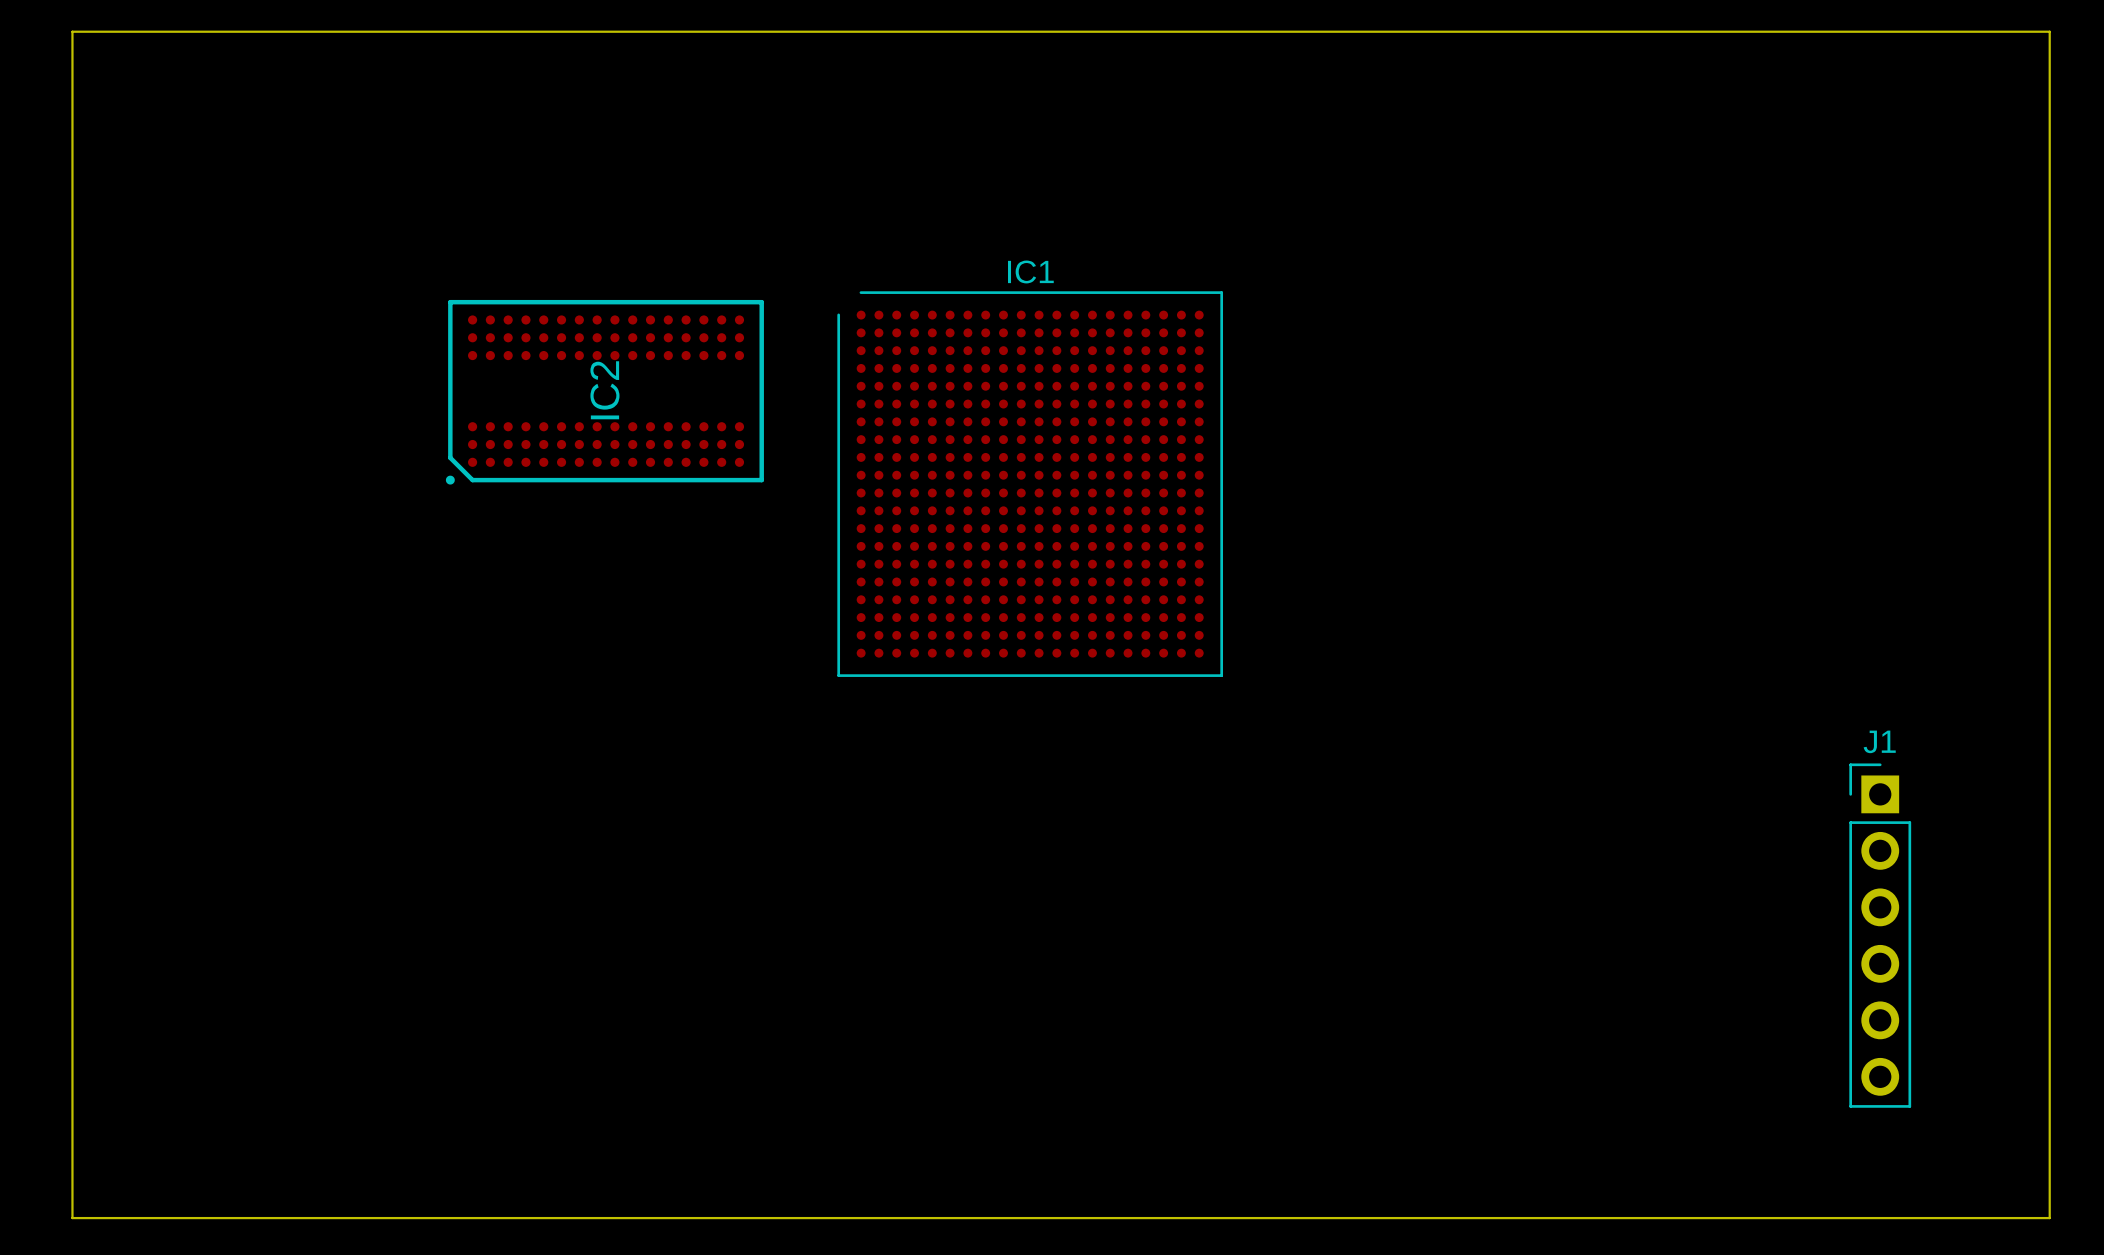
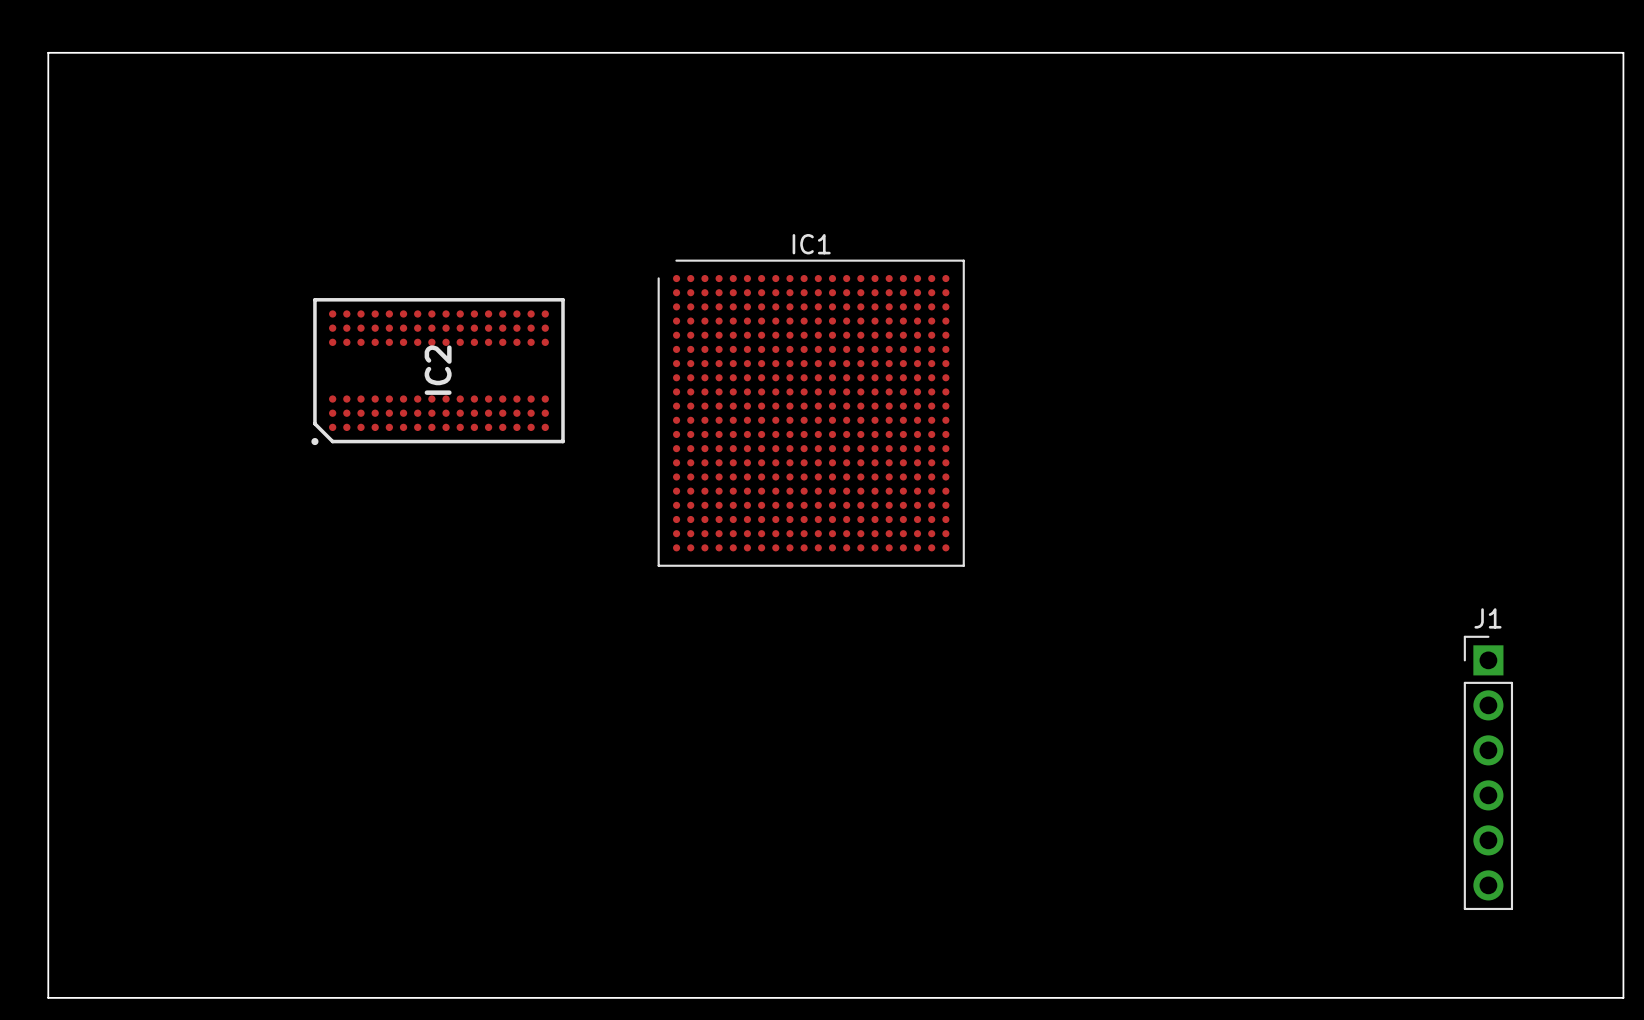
IC2 position: (604, 392) -> (438, 371)

